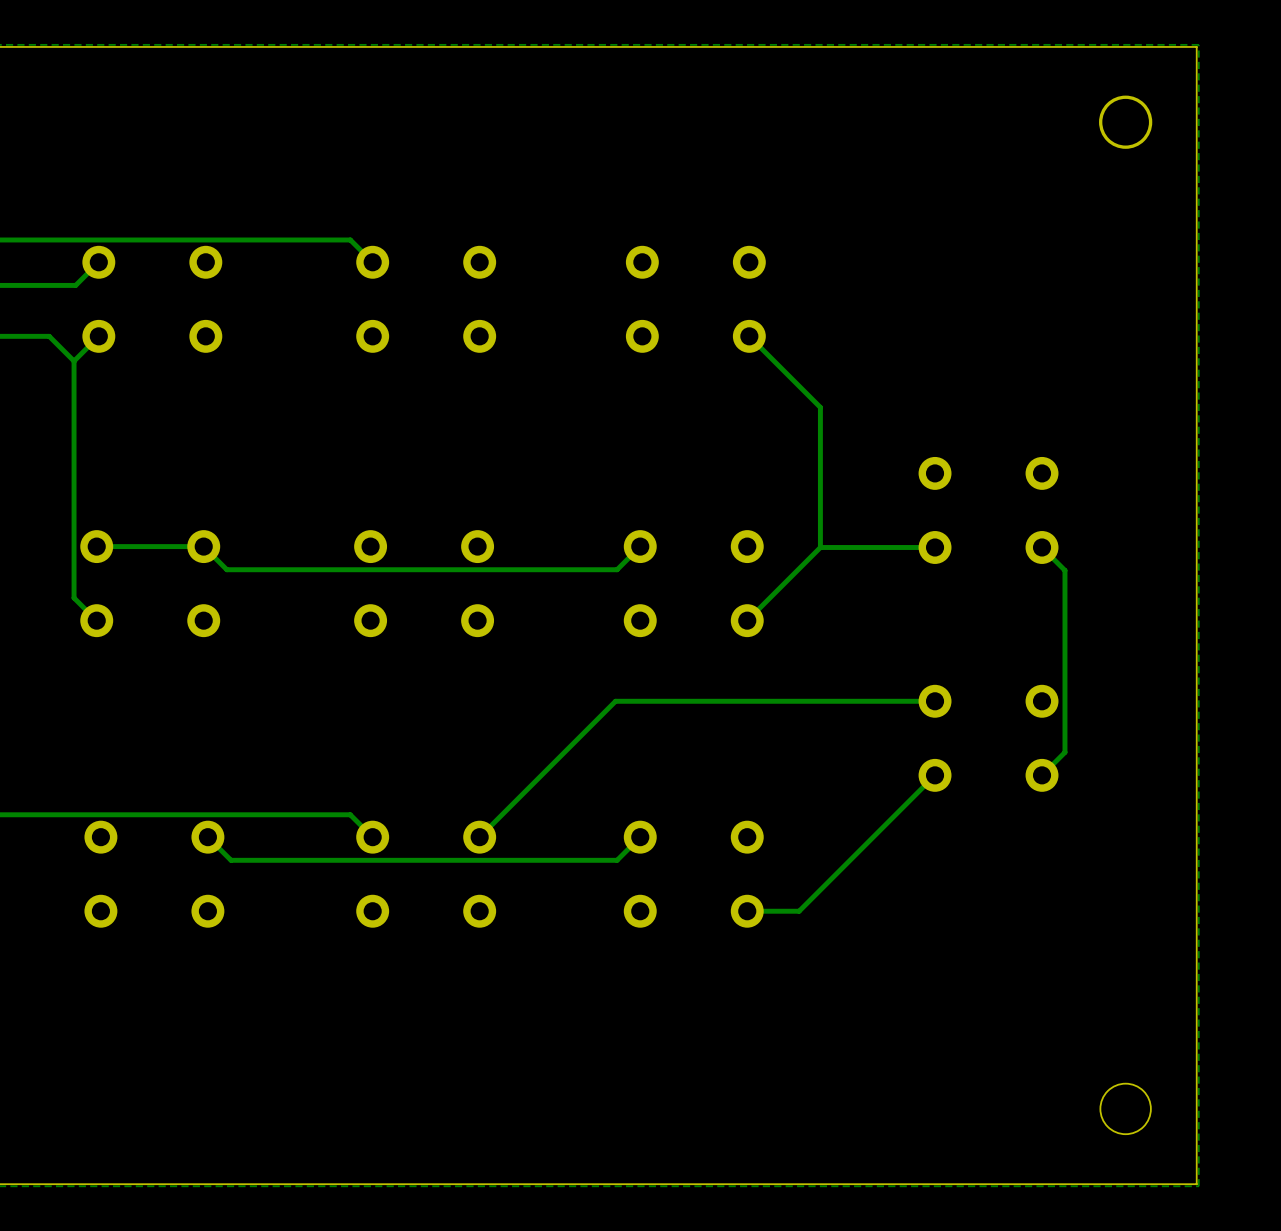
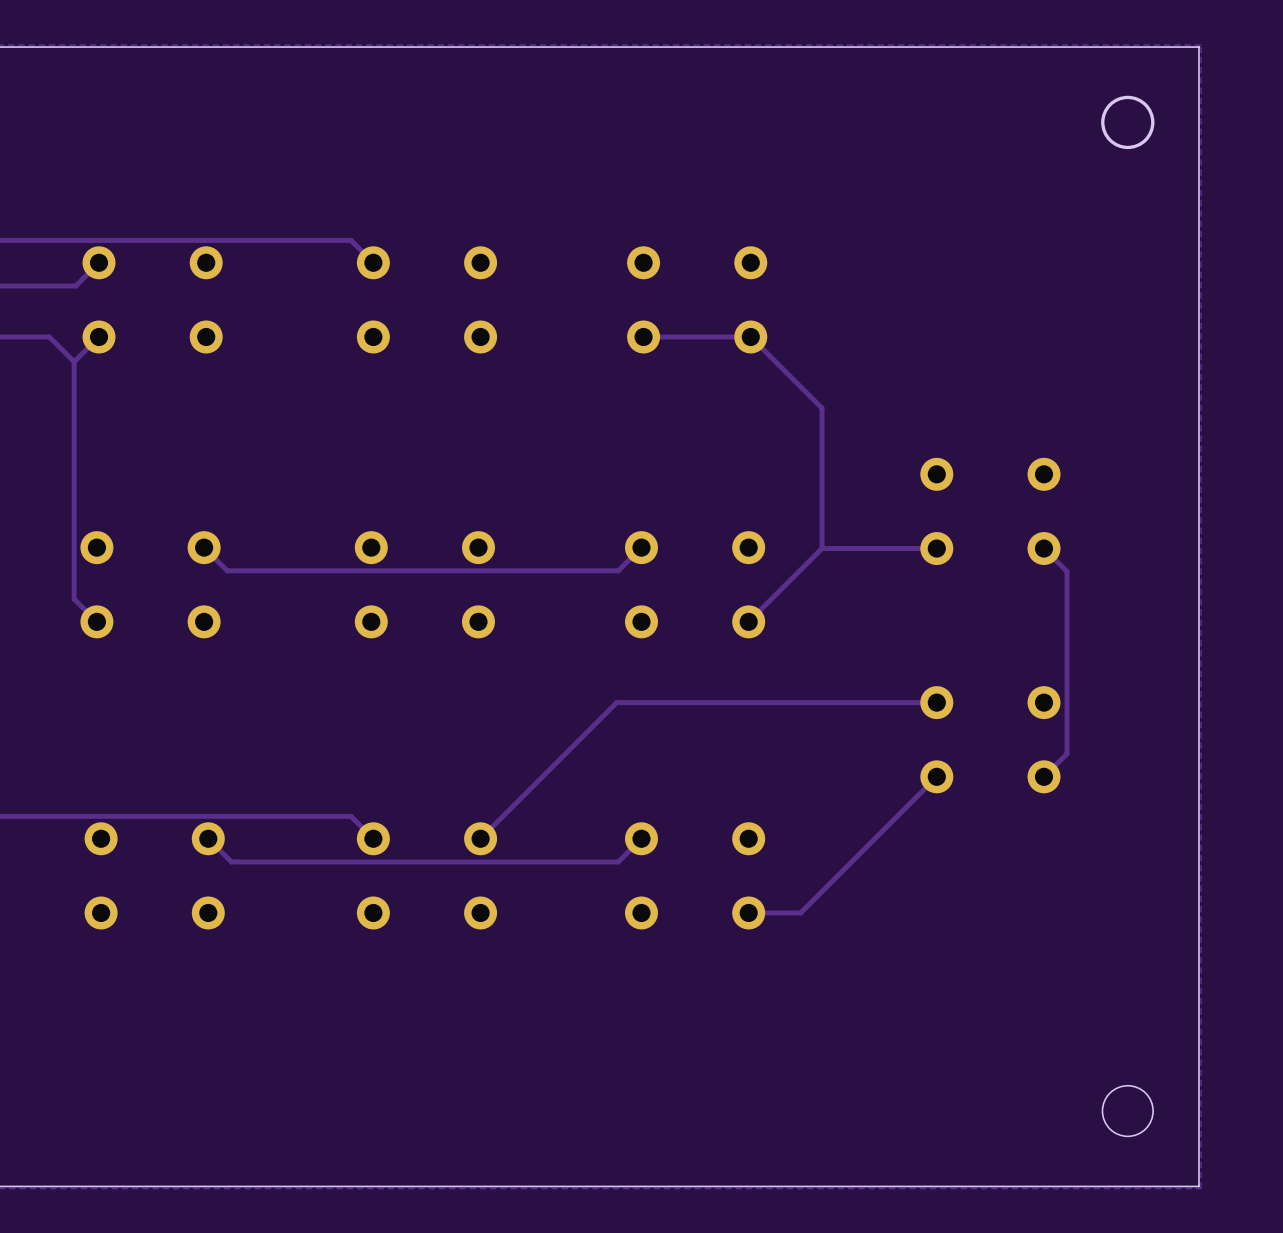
track: none -> (750, 336) (643, 336)
track: (203, 546) (96, 546) -> none

